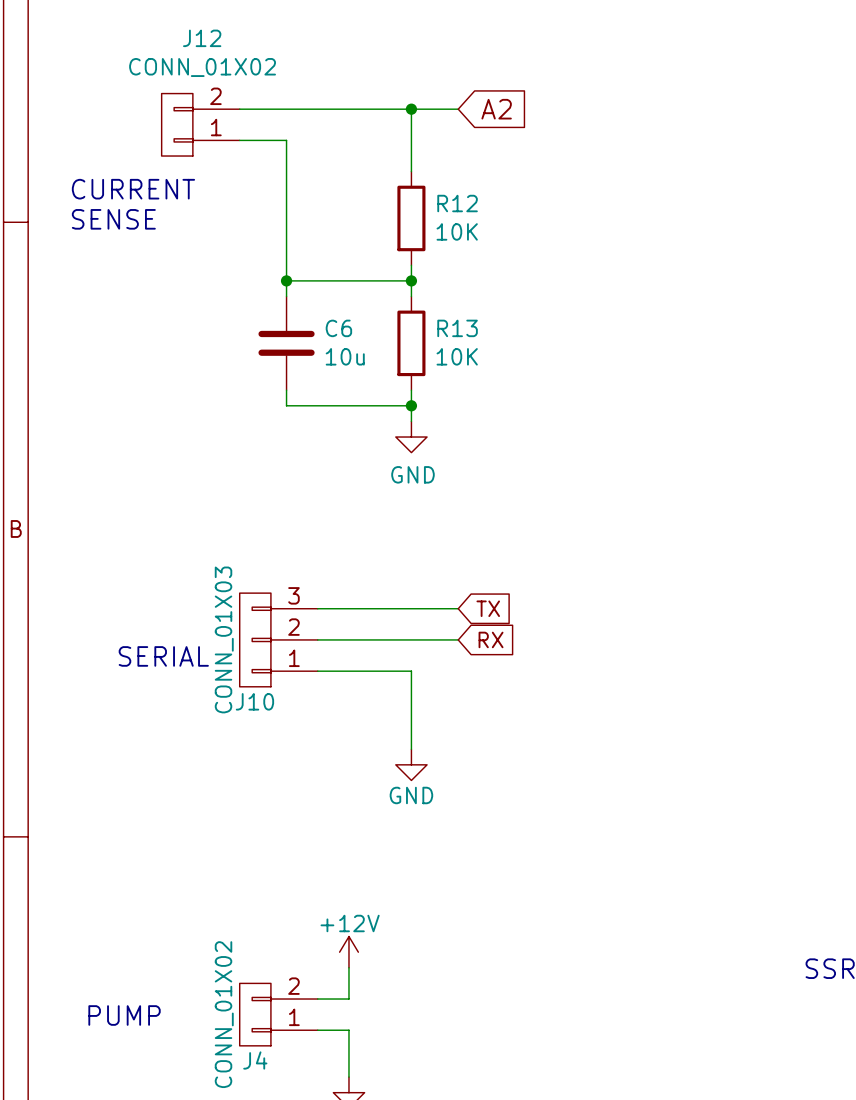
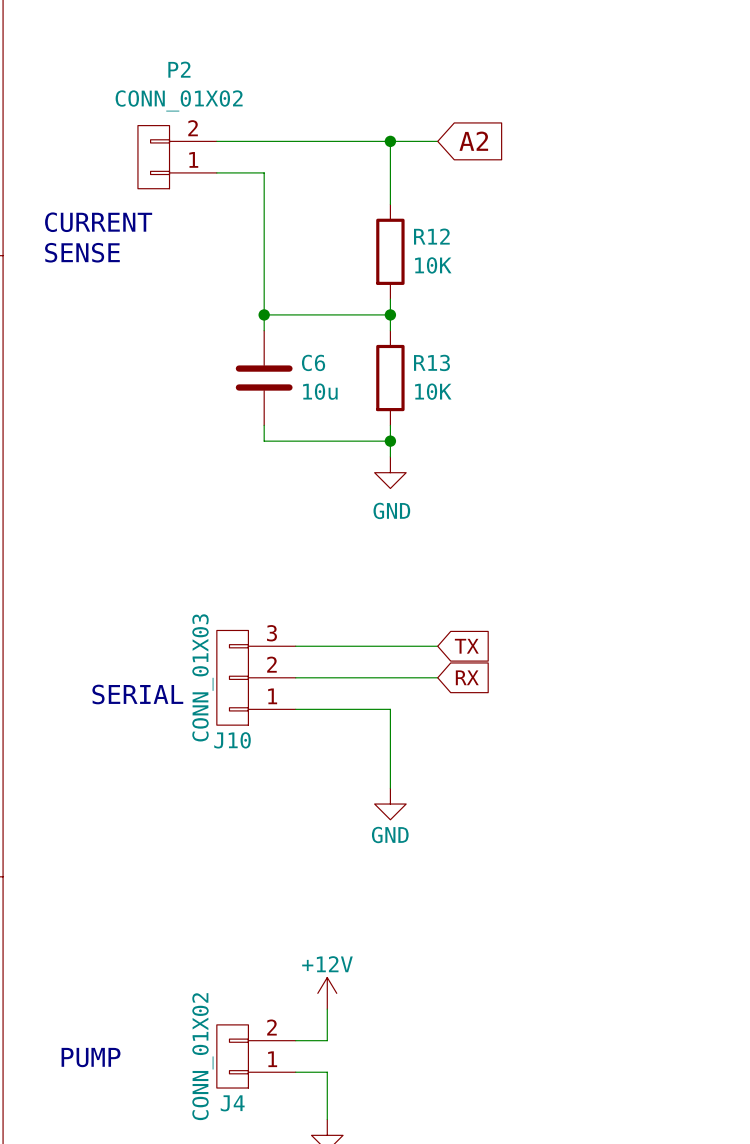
J12 name: J12 (202, 38) -> P2 (179, 69)

